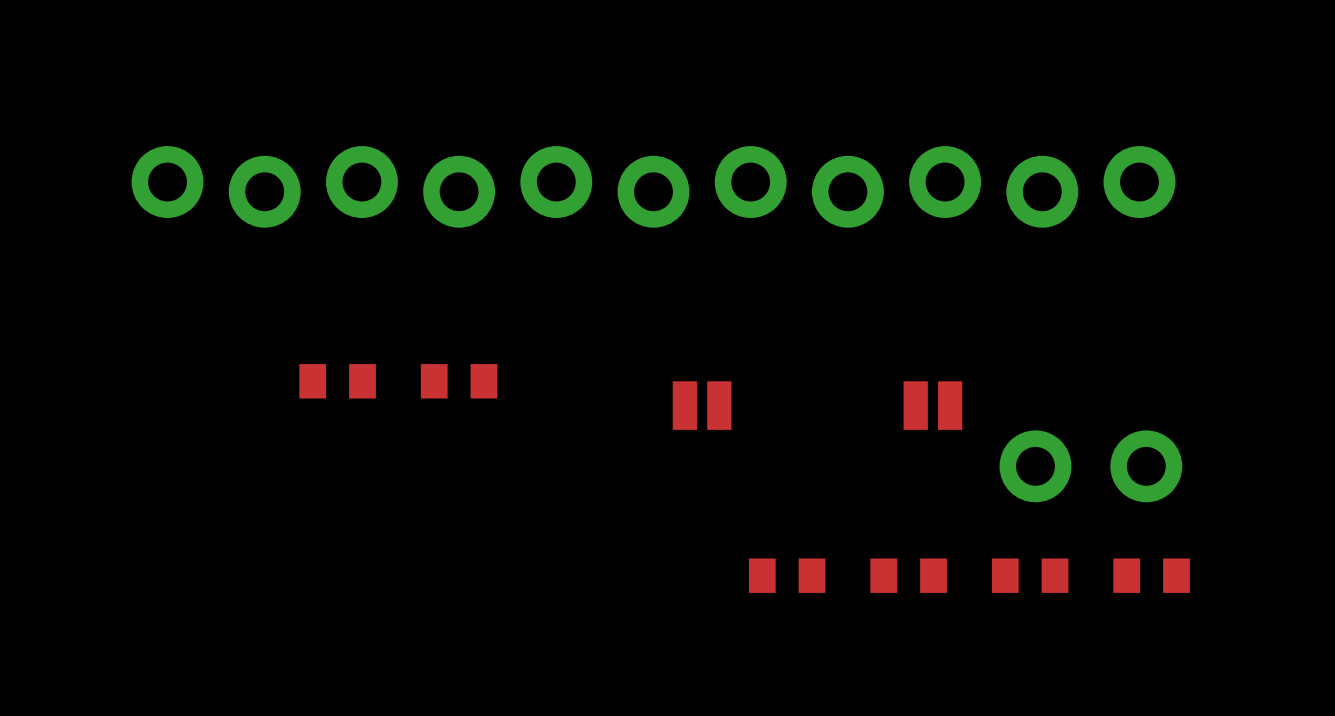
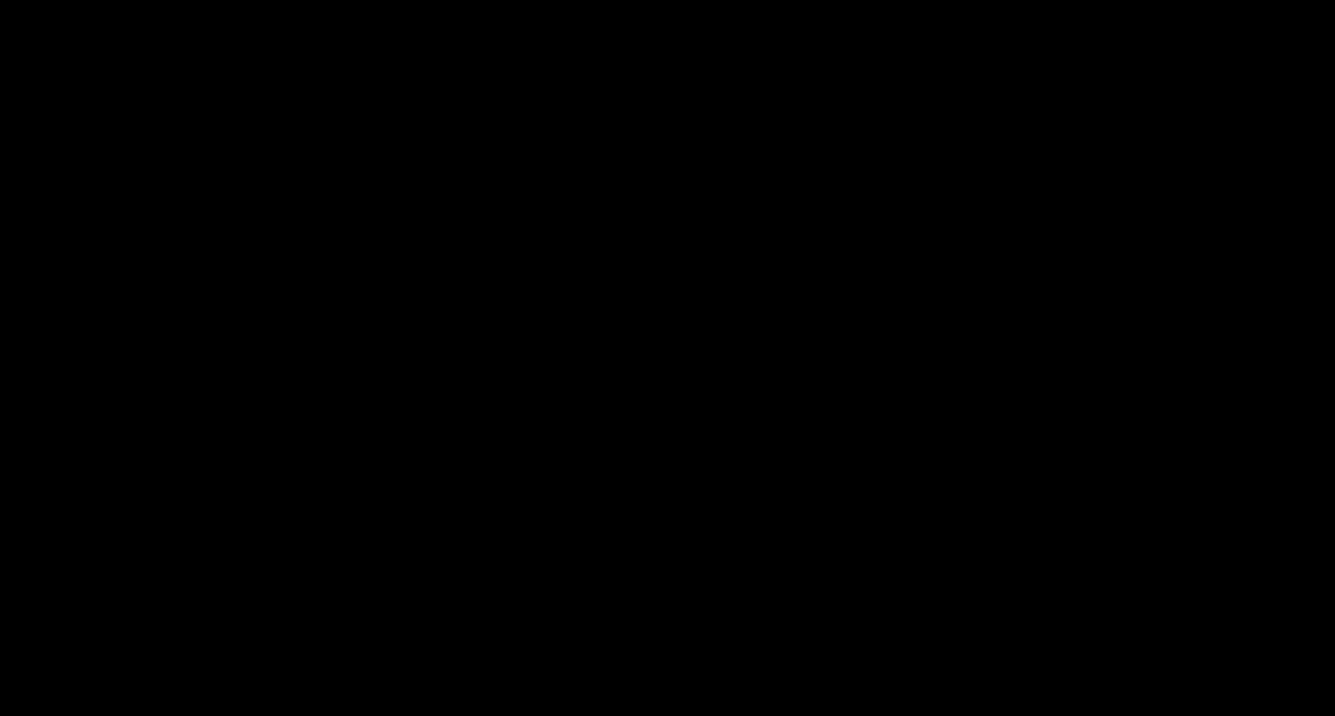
part: (653, 186) -> none
part: (337, 381) -> none
part: (459, 381) -> none
part: (702, 405) -> none
part: (932, 405) -> none
part: (1090, 466) -> none
part: (787, 575) -> none
part: (908, 575) -> none
part: (1030, 575) -> none
part: (1151, 575) -> none

